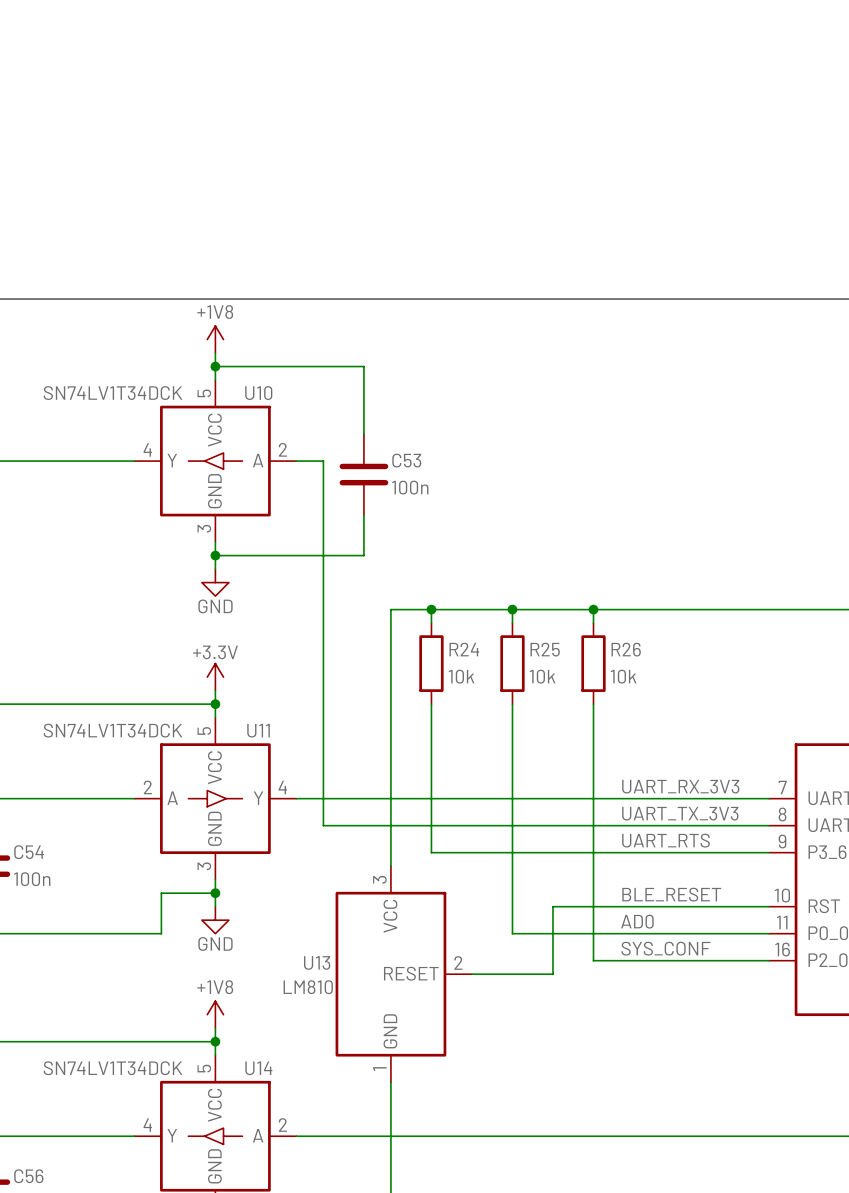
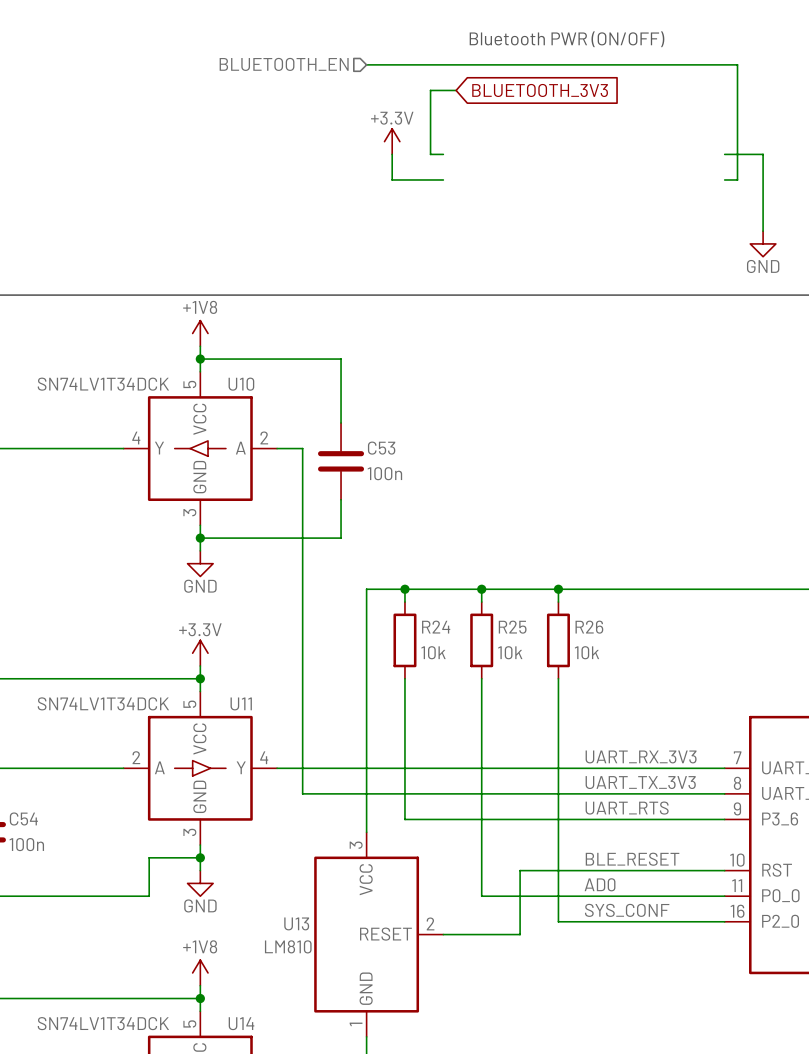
text: none -> Bluetooth PWR (ON/OFF) (567, 39)
hierarchical label: none -> BLUETOOTH_EN (284, 64)
wire: none -> (366, 64) (737, 64) (737, 179) (724, 179)
wire: none -> (456, 90) (430, 90) (430, 154) (443, 154)
global label: none -> BLUETOOTH_3V3 (540, 90)
power symbol: none -> +3.3V (392, 141)
wire: none -> (392, 154) (392, 179) (443, 179)
wire: none -> (724, 154) (763, 154) (763, 231)
power symbol: none -> GND (763, 243)

